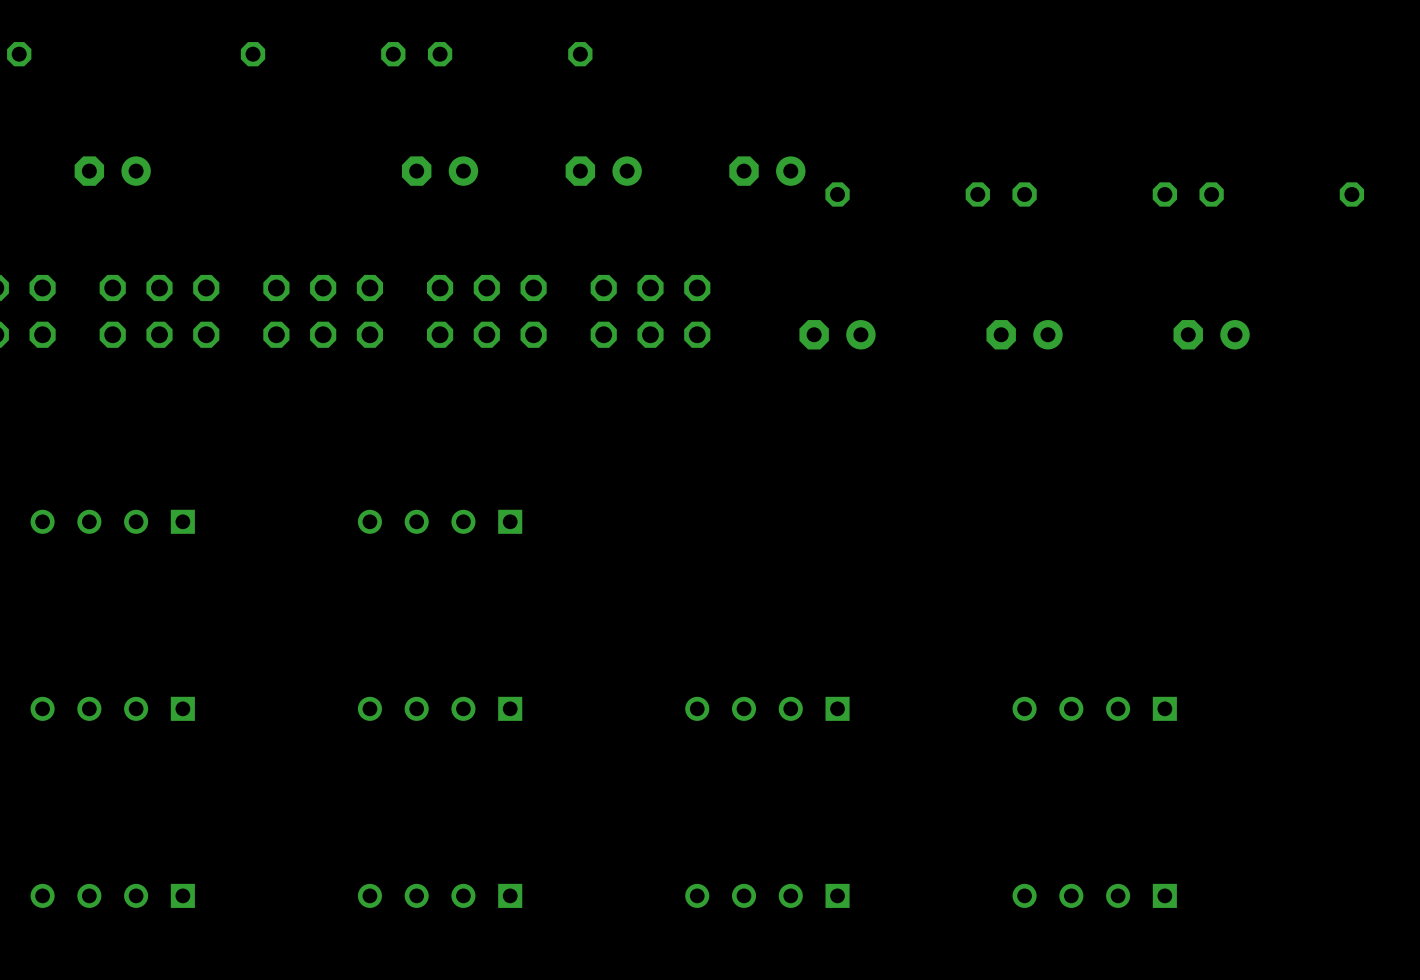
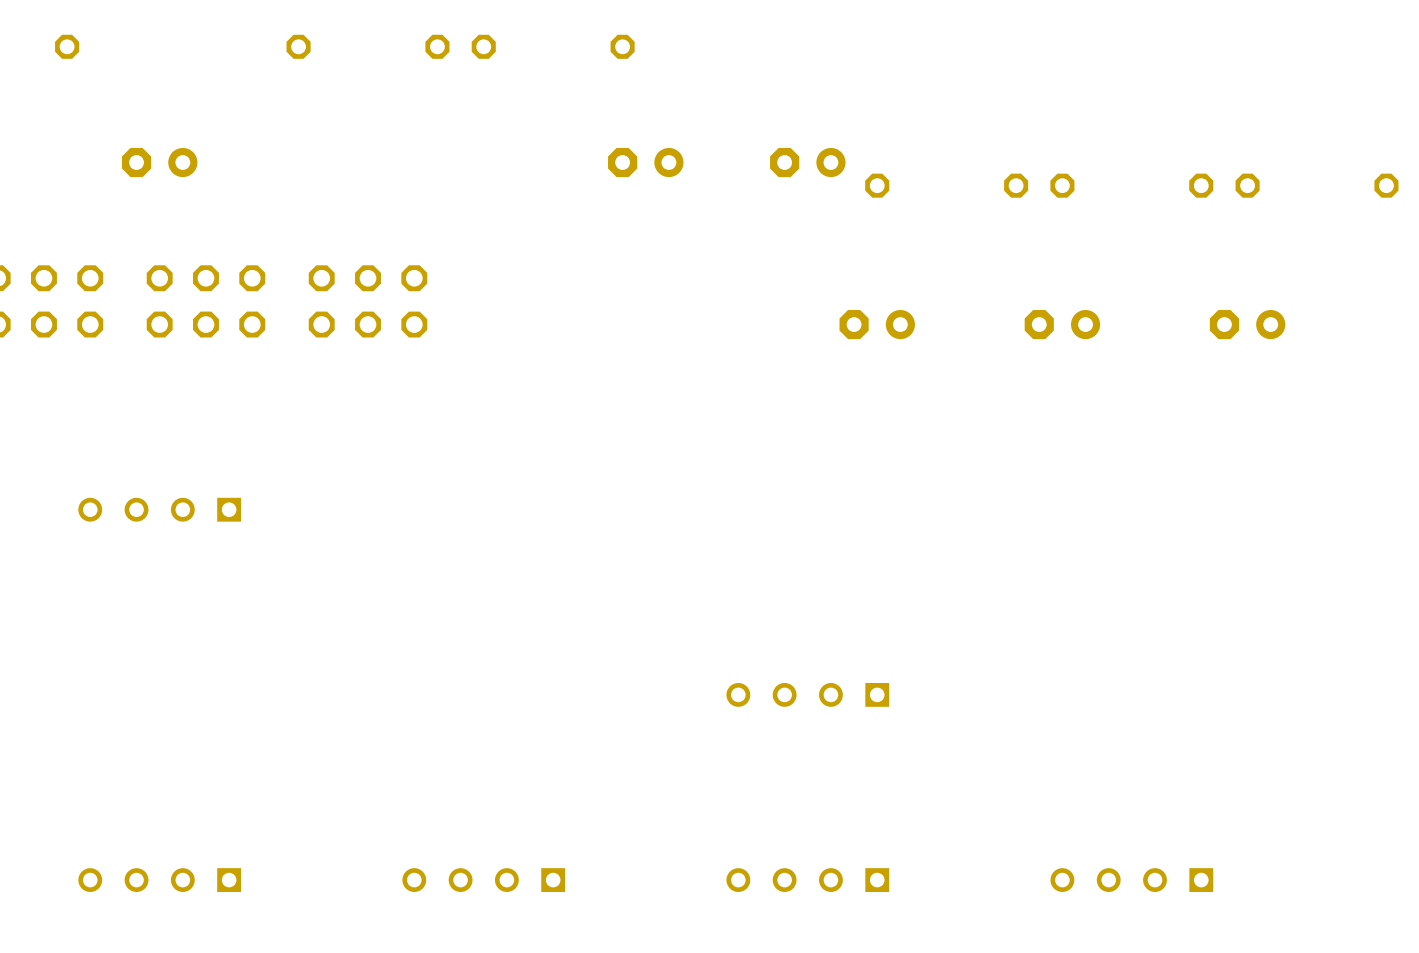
part: (440, 171) -> none
part: (486, 311) -> none
part: (650, 311) -> none
part: (440, 521) -> none
part: (112, 708) -> none
part: (440, 708) -> none
part: (1094, 708) -> none

